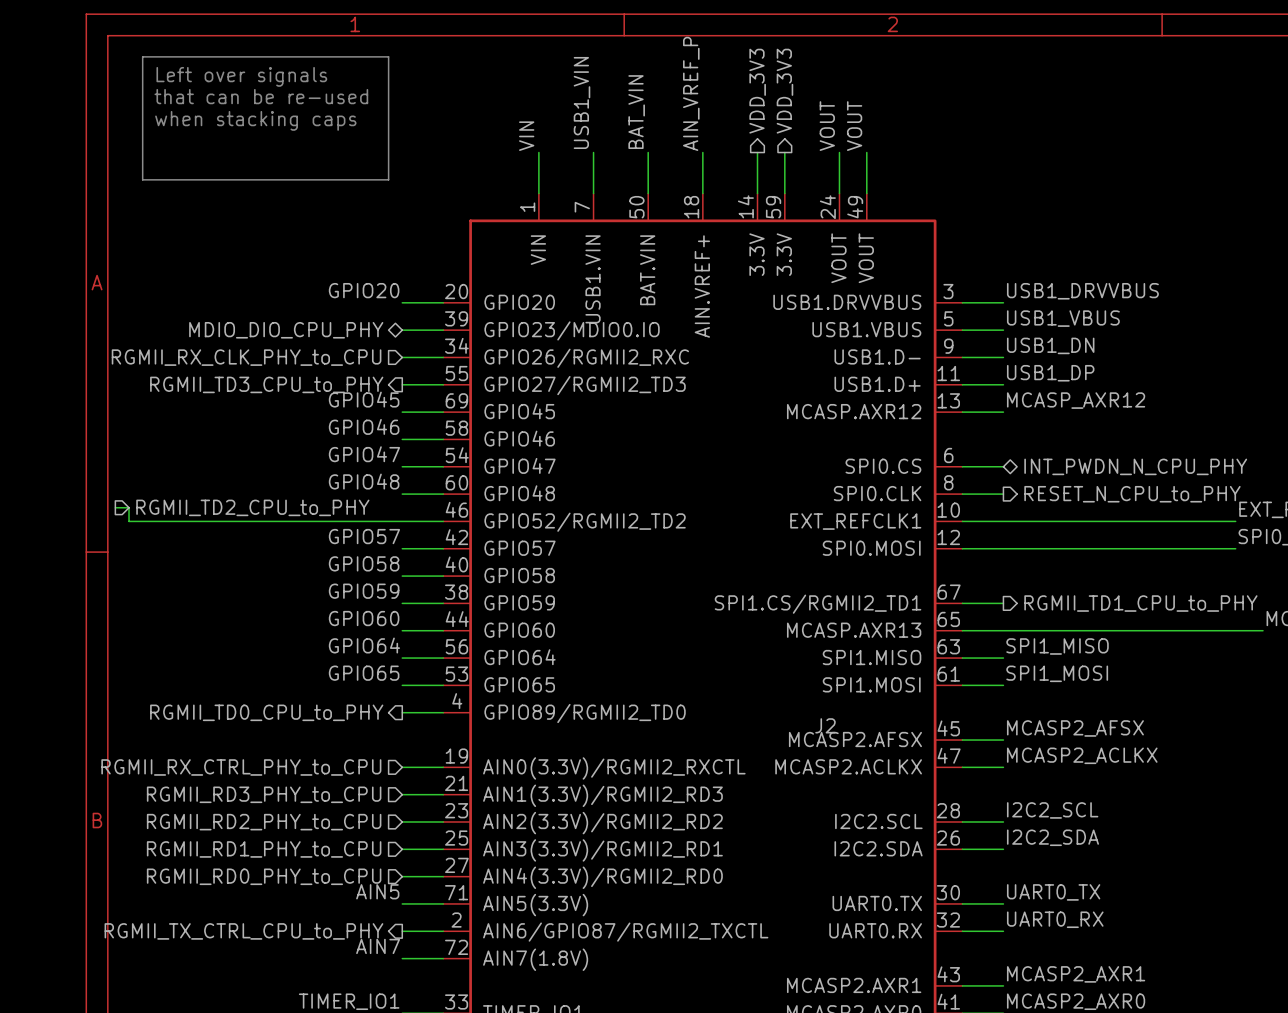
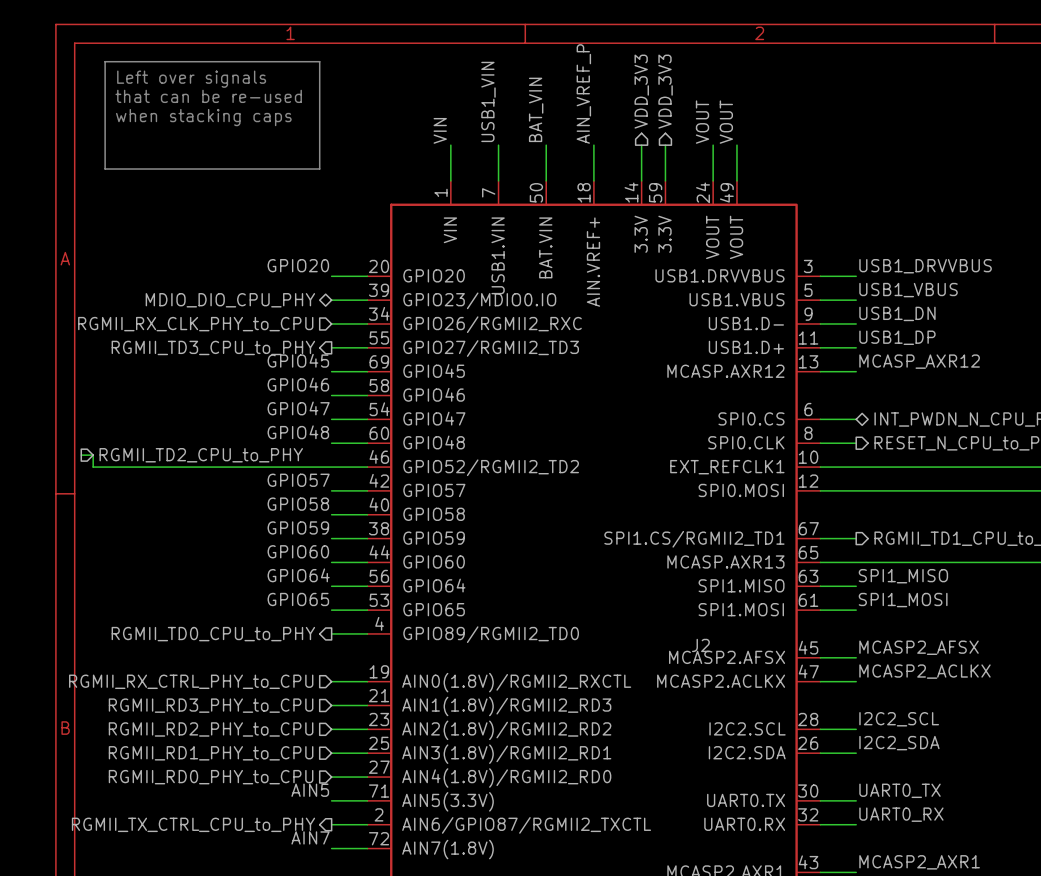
part pin name: AIN0(3.3V)/RGMII2_RXCTL (614, 768) -> AIN0(1.8V)/RGMII2_RXCTL (516, 682)
part pin name: AIN1(3.3V)/RGMII2_RD3 (602, 795) -> AIN1(1.8V)/RGMII2_RD3 (506, 706)
part pin name: AIN2(3.3V)/RGMII2_RD2 (602, 823) -> AIN2(1.8V)/RGMII2_RD2 (506, 730)
part pin name: AIN3(3.3V)/RGMII2_RD1 (602, 850) -> AIN3(1.8V)/RGMII2_RD1 (506, 754)
part pin name: AIN4(3.3V)/RGMII2_RD0 (602, 877) -> AIN4(1.8V)/RGMII2_RD0 (506, 778)

